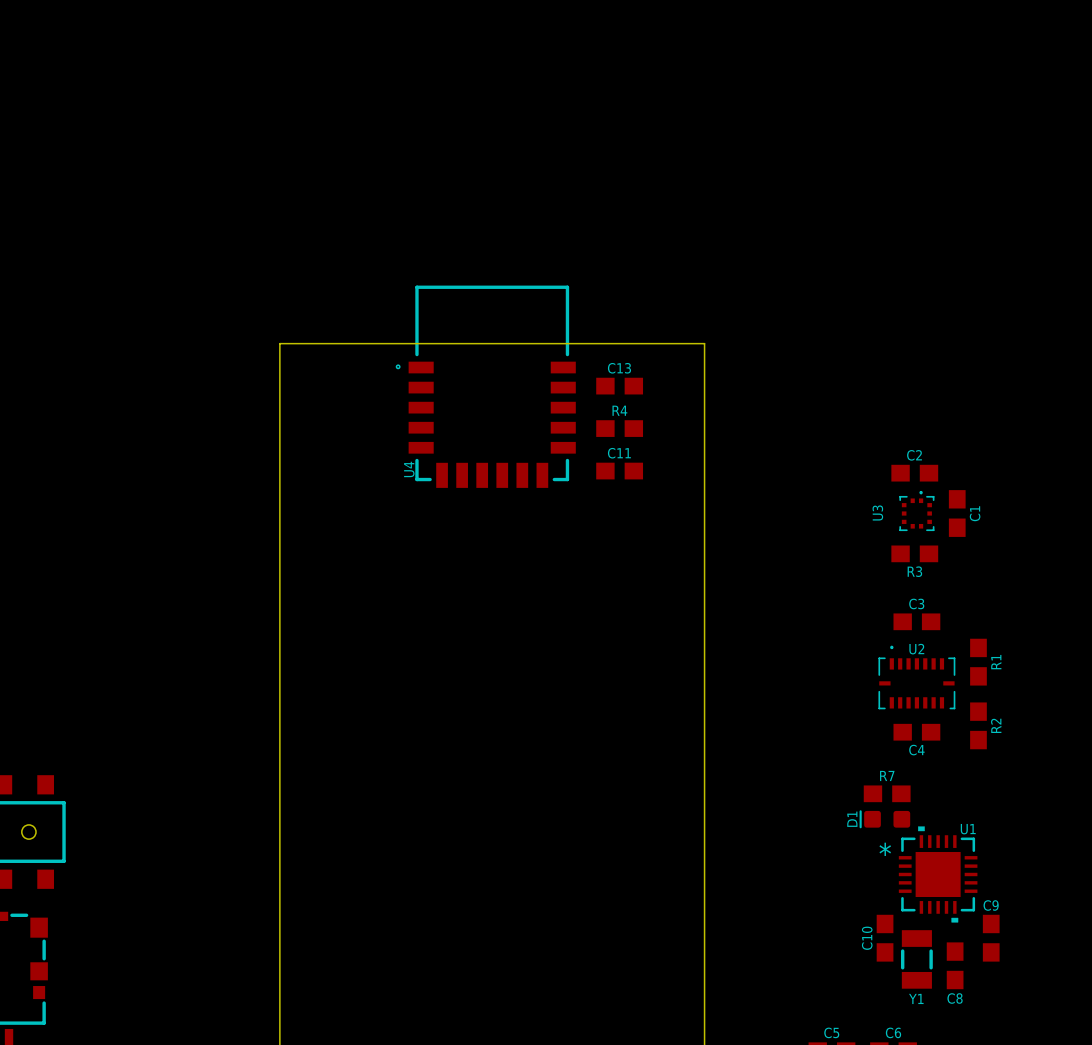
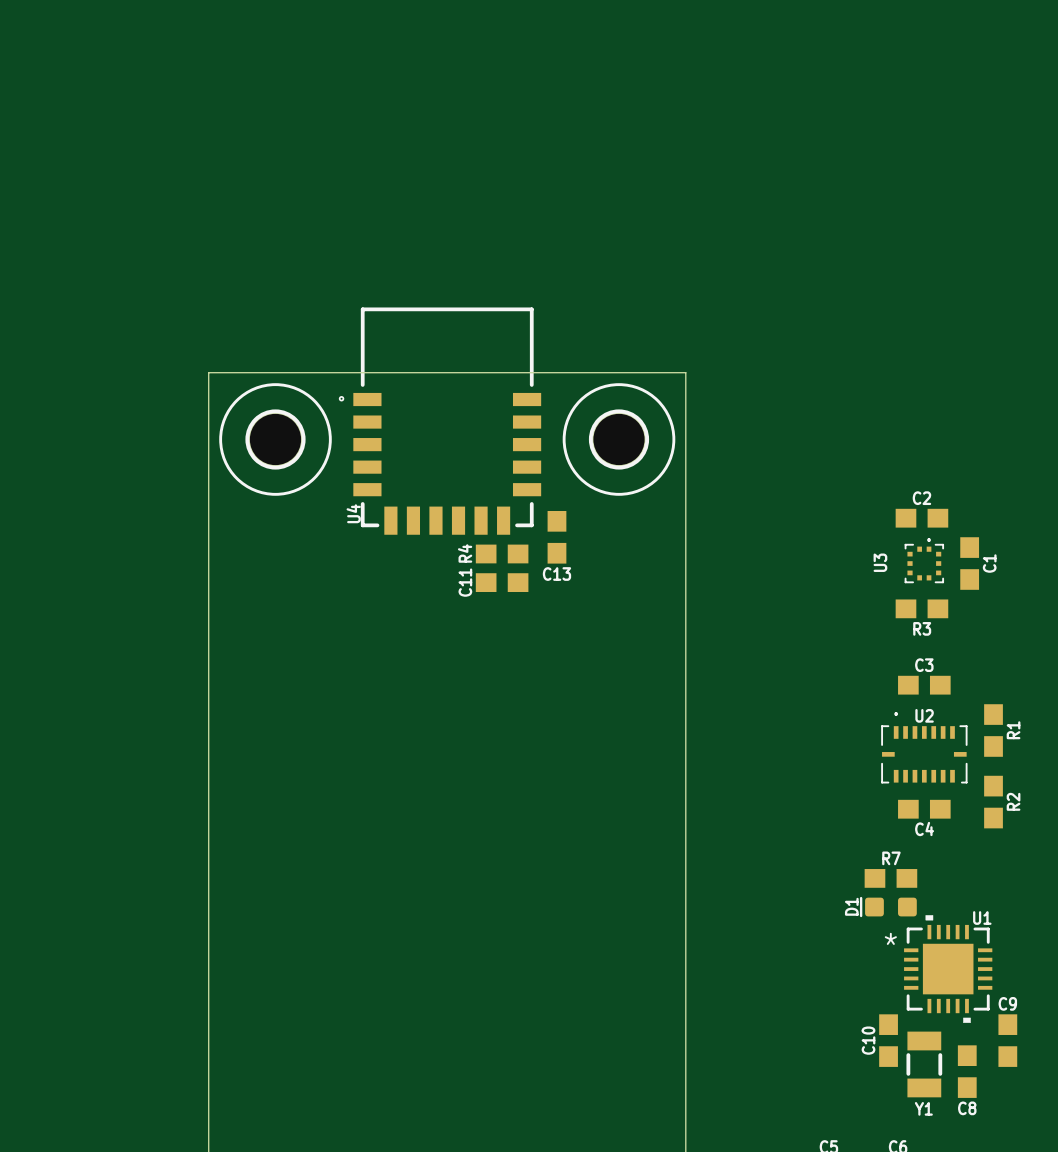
C13 name position: C13 (619, 368) -> C13 (556, 574)
C13 rotation: 0° (619, 386) -> 90° clockwise (556, 537)
C13 position: (619, 386) -> (556, 537)
part: none -> (275, 439)
part: none -> (619, 439)
R4 name rotation: 0° (619, 410) -> 90° counterclockwise (465, 553)
R4 name position: R4 (619, 410) -> R4 (465, 553)
R4 position: (619, 428) -> (502, 553)
C11 name rotation: 0° (619, 453) -> 90° counterclockwise (465, 582)
C11 name position: C11 (619, 453) -> C11 (465, 582)
C11 position: (619, 471) -> (502, 582)

